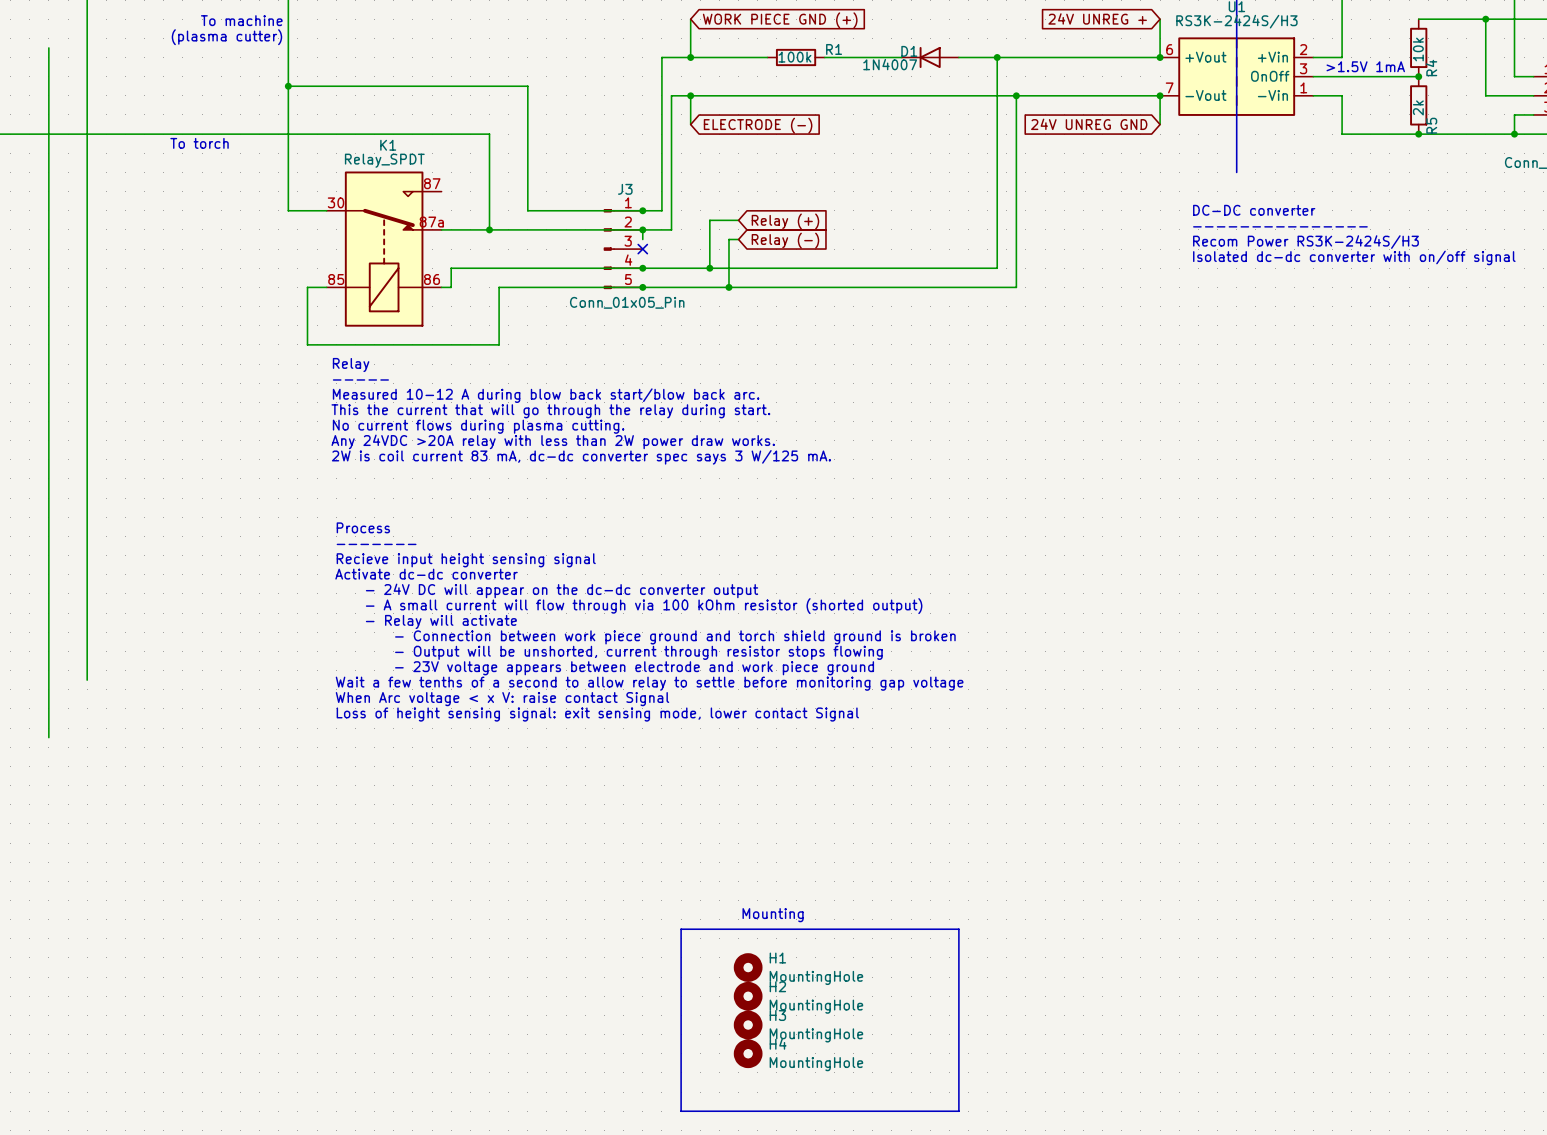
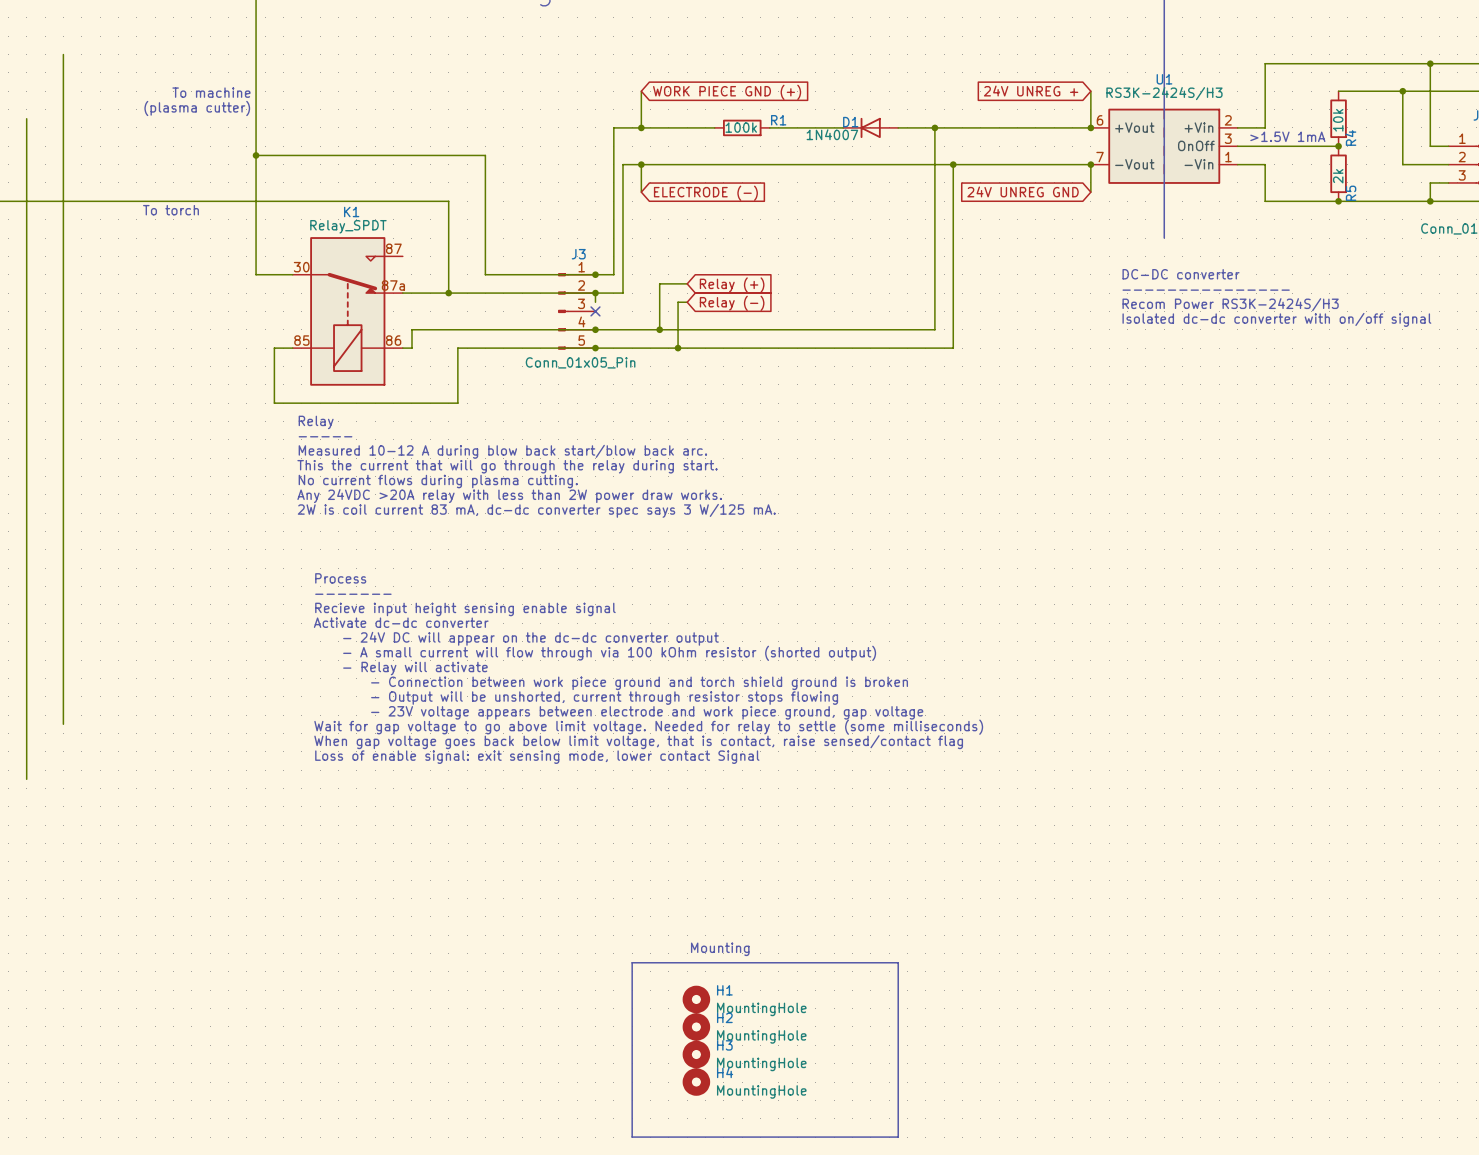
text position: Process (363, 527) -> Process (340, 578)
text position: ------- (376, 544) -> ------- (353, 594)
text: Recieve input height sensing signal (466, 560) -> Recieve input height sensing enable signal (465, 609)
text position: Activate dc-dc converter (426, 574) -> Activate dc-dc converter (401, 622)
text position: - 24V DC will appear on the dc-dc converter output (562, 590) -> - 24V DC will appear on the dc-dc converter output (530, 638)
text position: - A small current will flow through via 100 kOhm resistor (shorted output) (644, 606) -> - A small current will flow through via 100 kOhm resistor (shorted output) (609, 653)
text position: - Relay will activate (441, 621) -> - Relay will activate (415, 668)
text position: - Connection between work piece ground and torch shield ground is broken (675, 637) -> - Connection between work piece ground and torch shield ground is broken (639, 683)
text position: - Output will be unshorted, current through resistor stops flowing (638, 652) -> - Output will be unshorted, current through resistor stops flowing (604, 698)
text: - 23V voltage appears between electrode and work piece ground (634, 668) -> - 23V voltage appears between electrode and work piece ground, gap voltage (647, 712)
text: Wait a few tenths of a second to allow relay to settle before monitoring gap voltage (649, 683) -> none
text: none -> Wait for gap voltage to go above limit voltage. Needed for relay to settle (some milliseconds) (648, 727)
text: none -> When gap voltage goes back below limit voltage, that is contact, raise sensed/contact flag (638, 742)
text: When Arc voltage < x V: raise contact Signal (502, 699) -> none
text: Loss of height sensing signal: exit sensing mode, lower contact Signal (597, 714) -> Loss of enable signal: exit sensing mode, lower contact Signal (537, 757)

